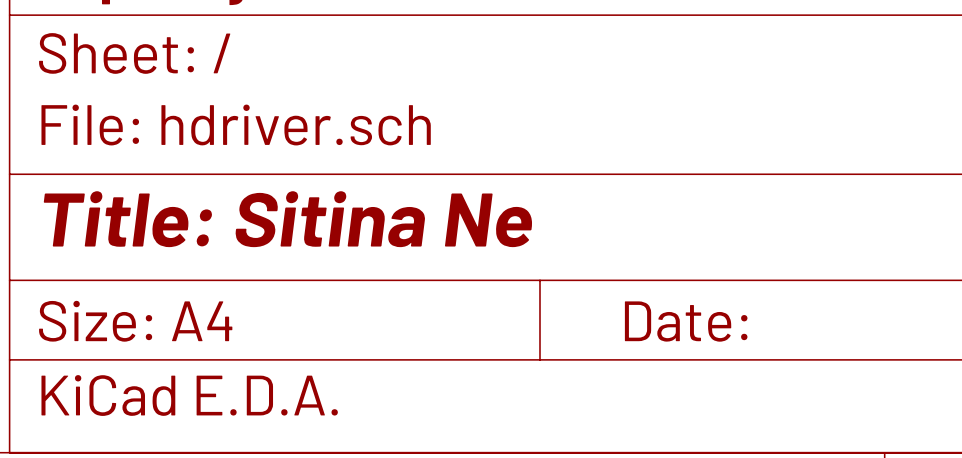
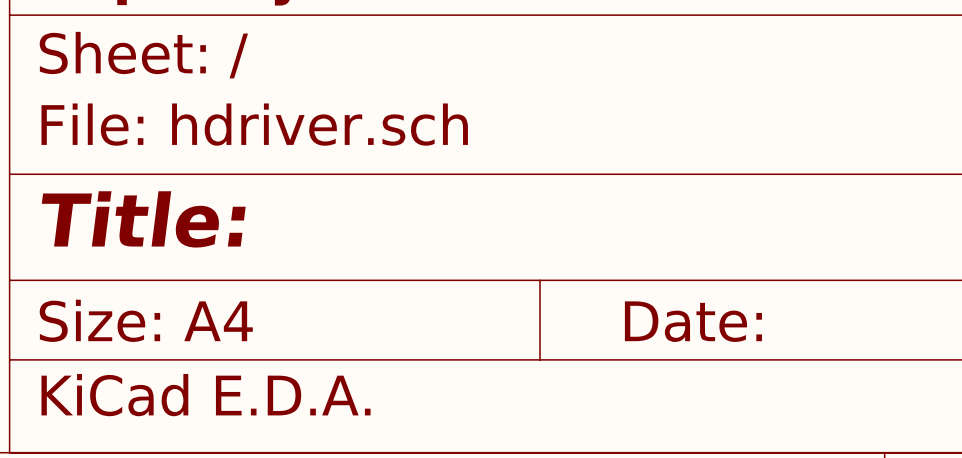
title block: Title: Sitina Ne (287, 219) -> Title: (143, 219)

